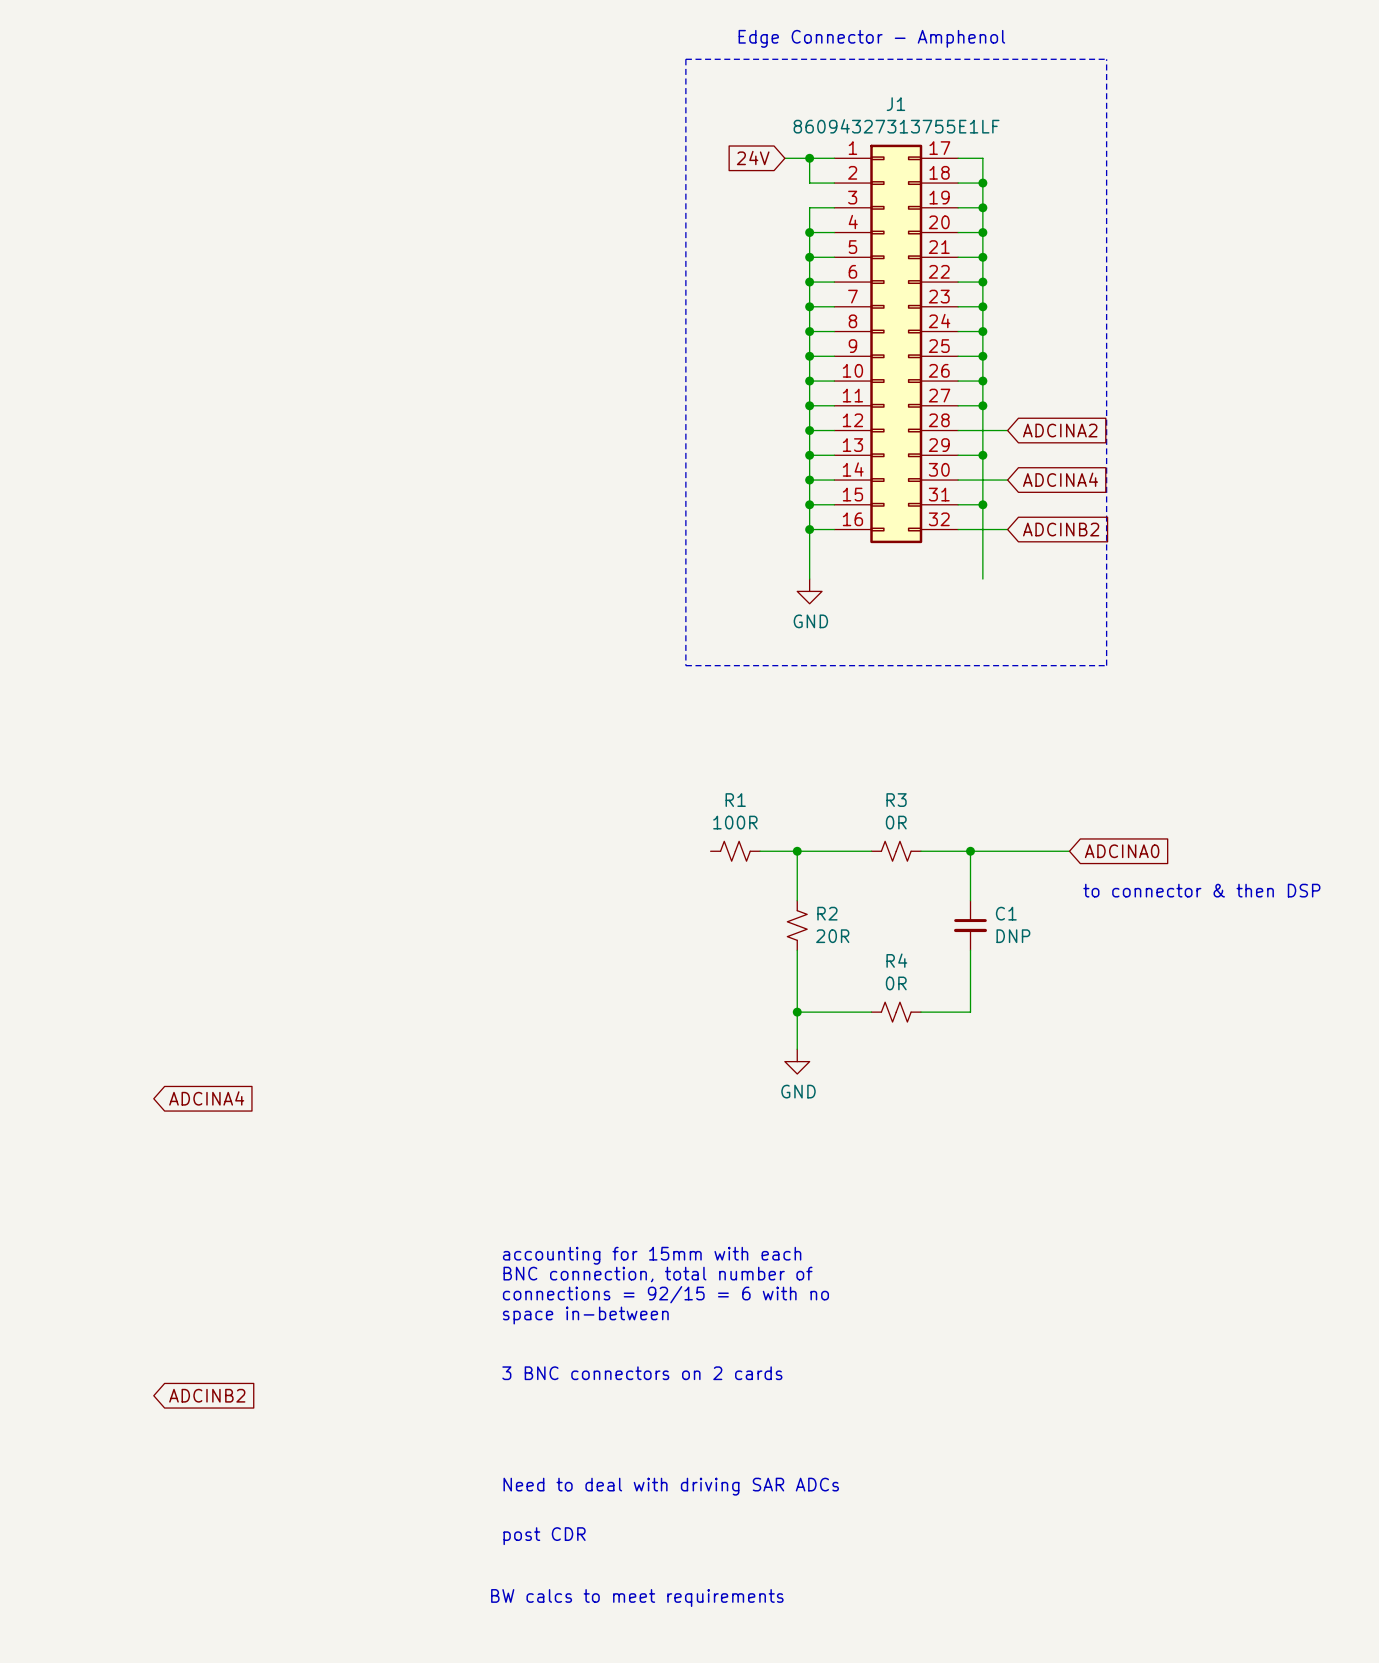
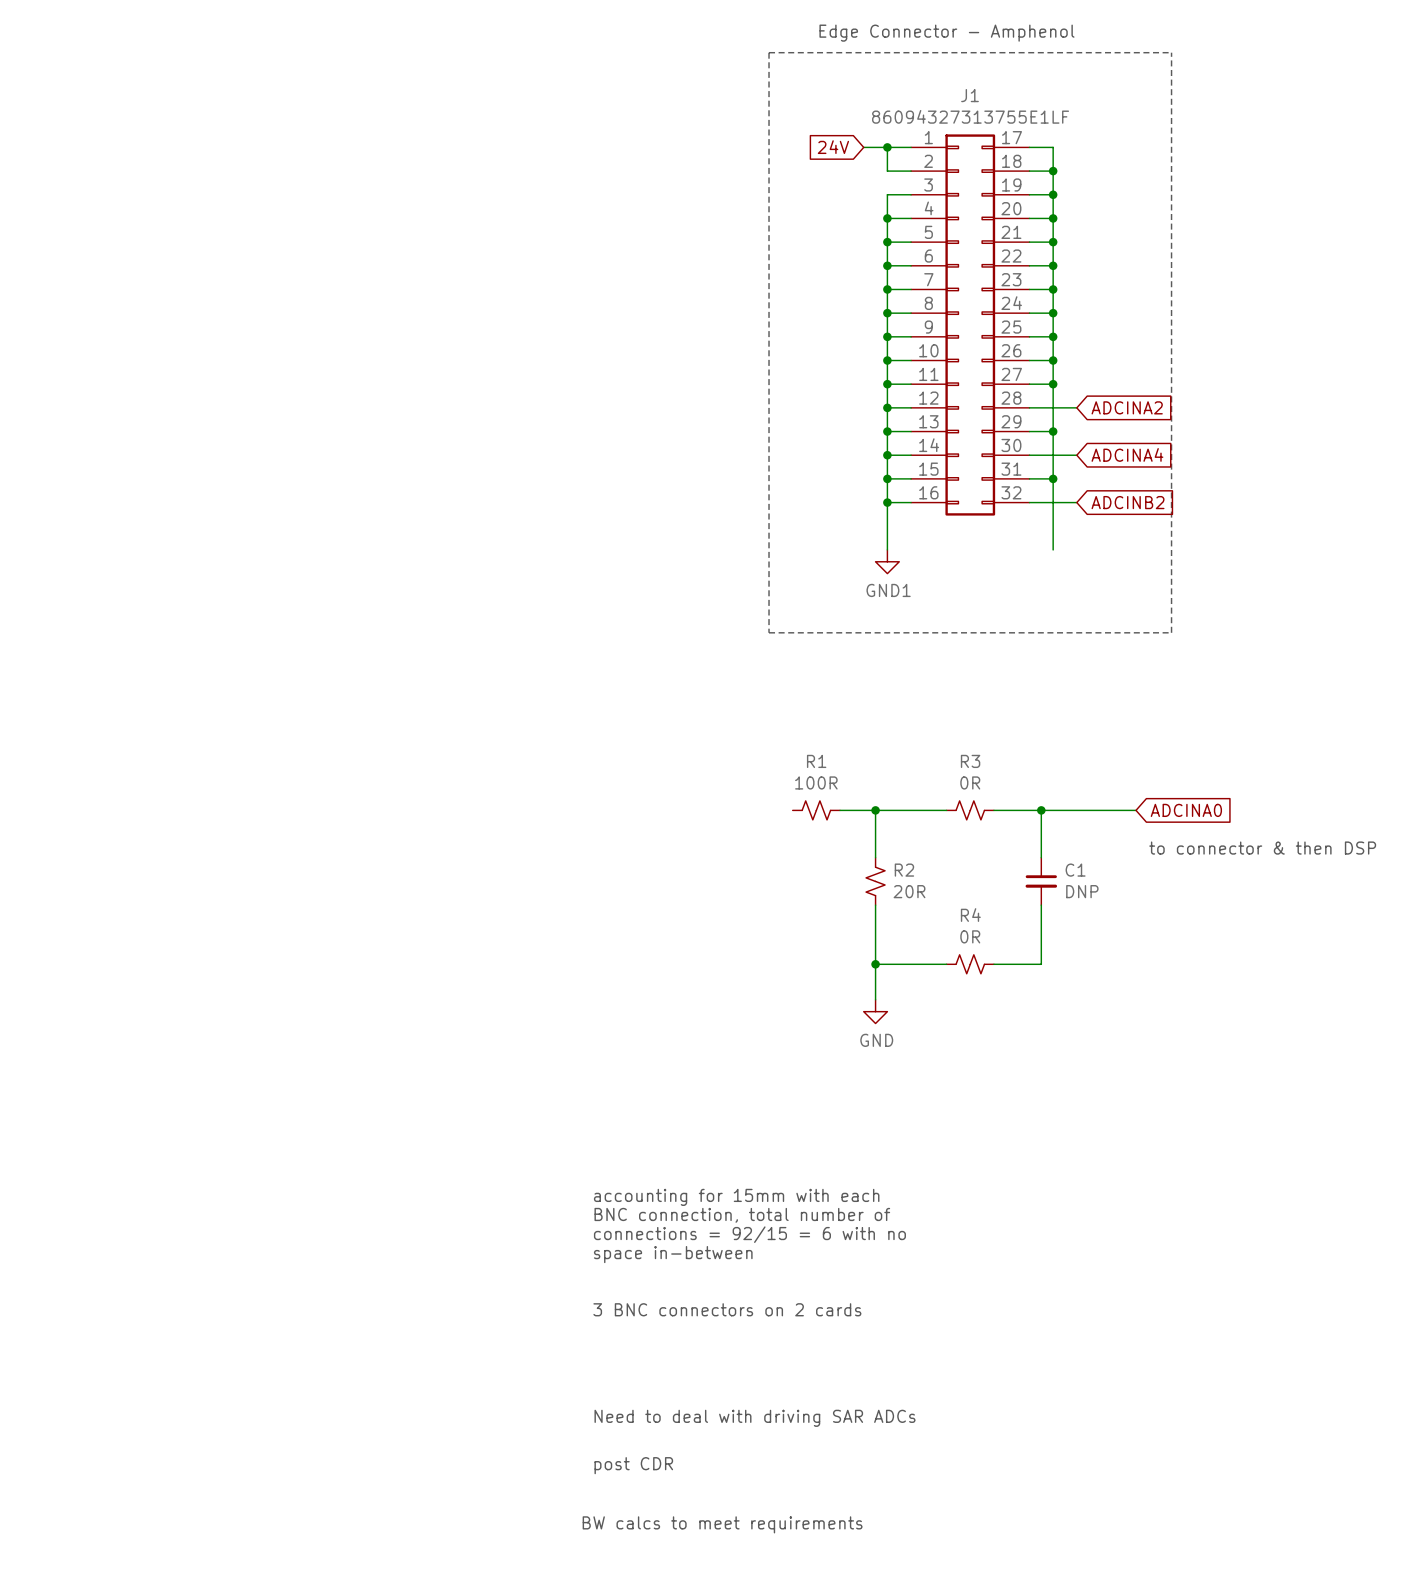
power symbol: GND (809, 591) -> GND1 (887, 561)
global label: ADCINA4 (206, 1098) -> none
global label: ADCINB2 (207, 1395) -> none

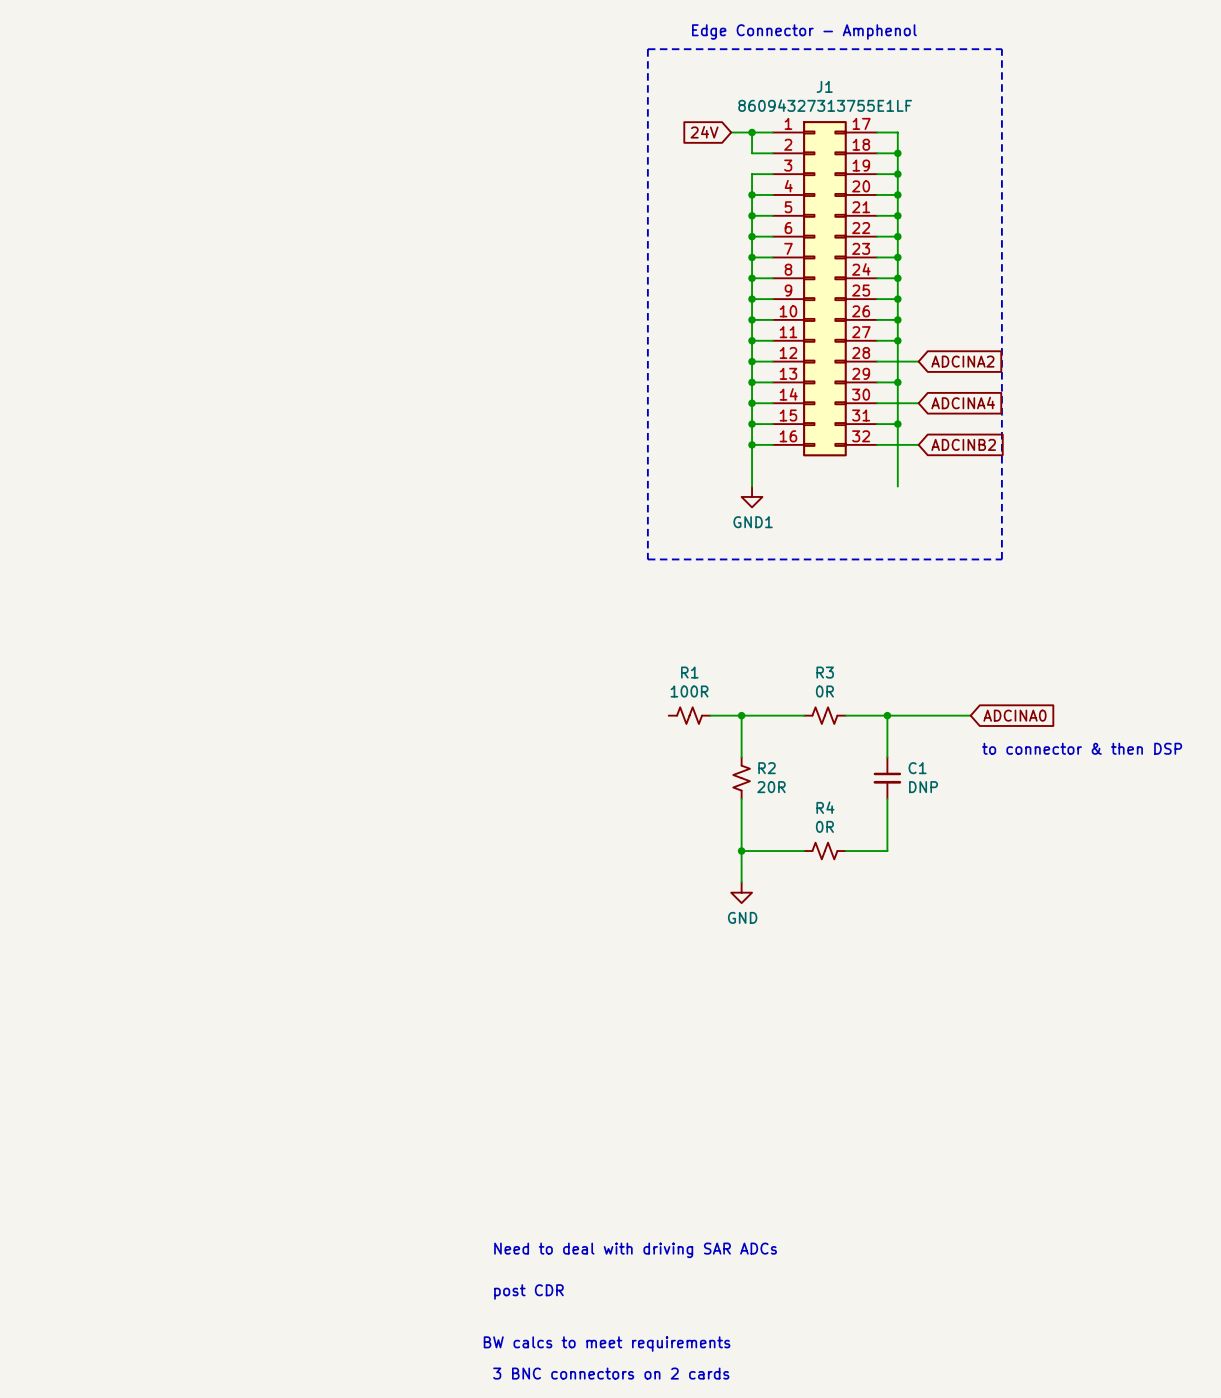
text: accounting for 15mm with each (736, 1197) -> none
text: BNC connection, total number of (742, 1215) -> none
text: connections = 92/15 = 6 with no (749, 1234) -> none
text: space in-between (673, 1254) -> none
text: 3 BNC connectors on 2 cards (727, 1309) -> none
text: none -> 3 BNC connectors on 2 cards (611, 1373)

